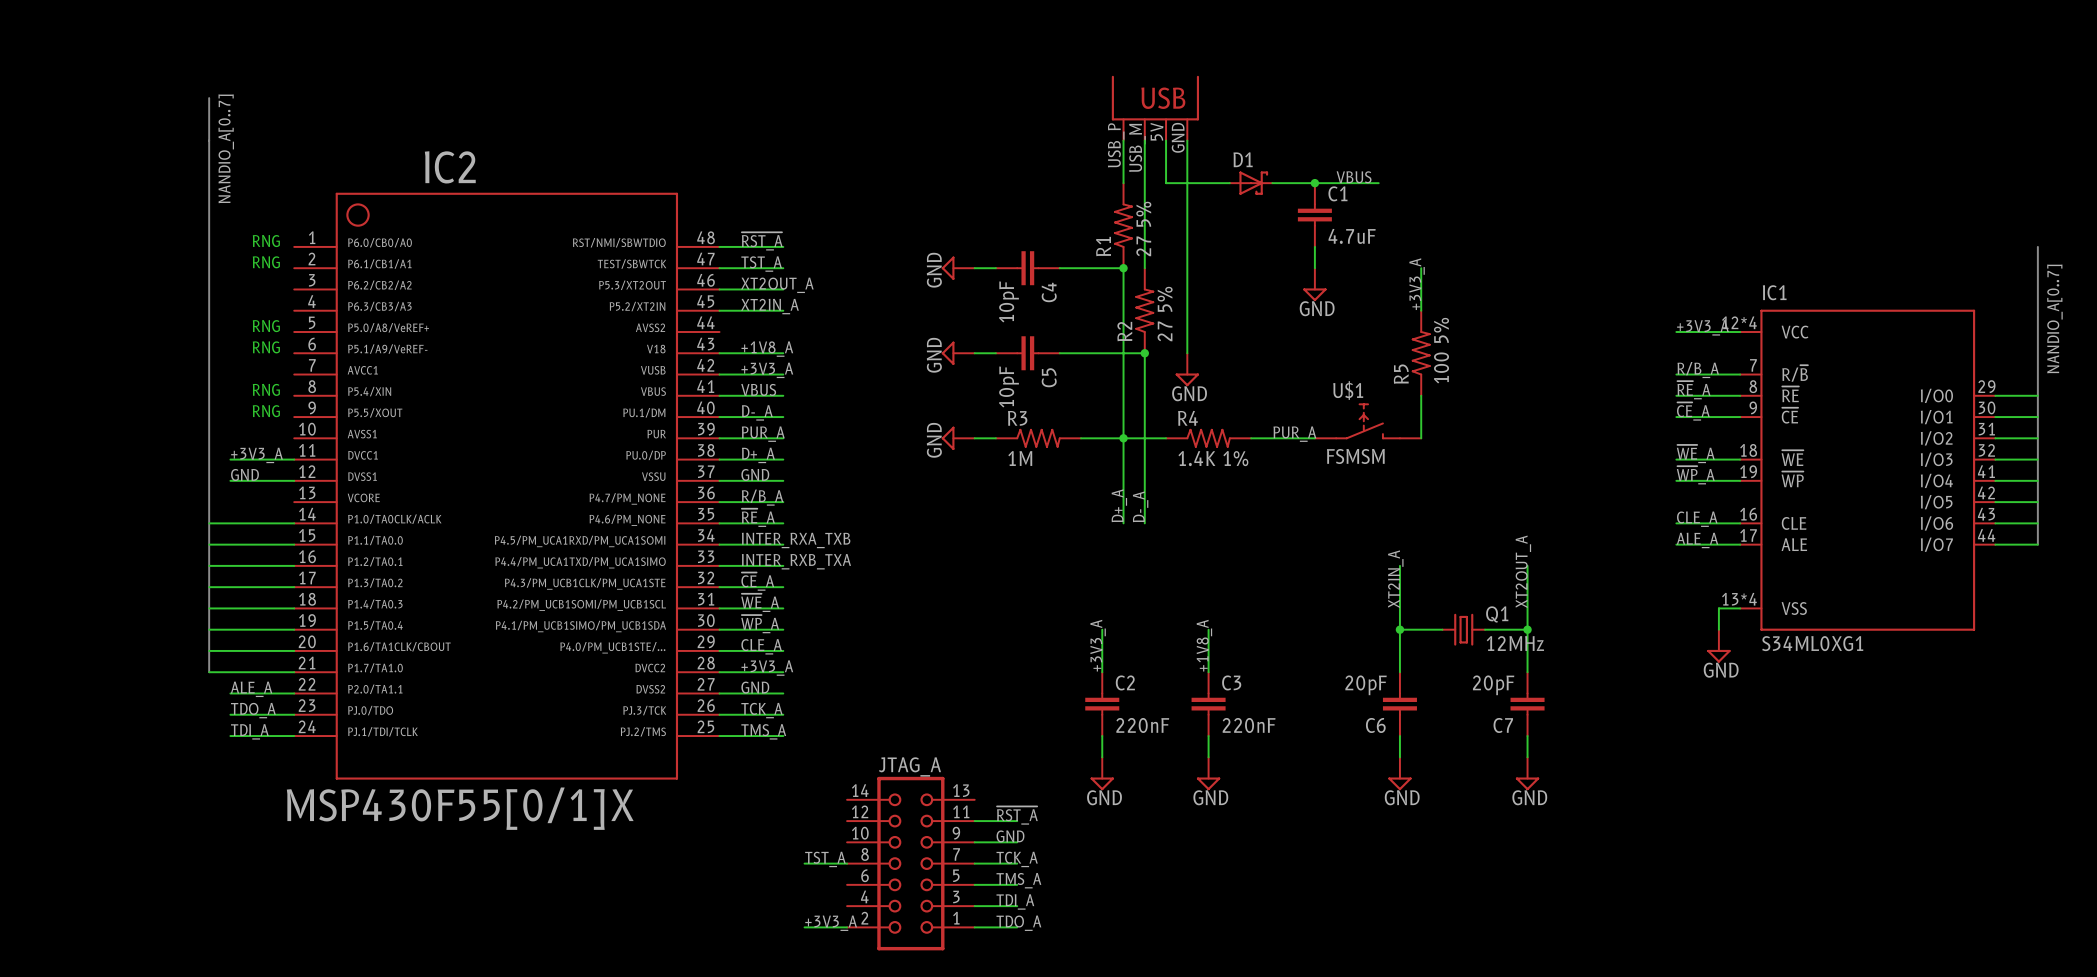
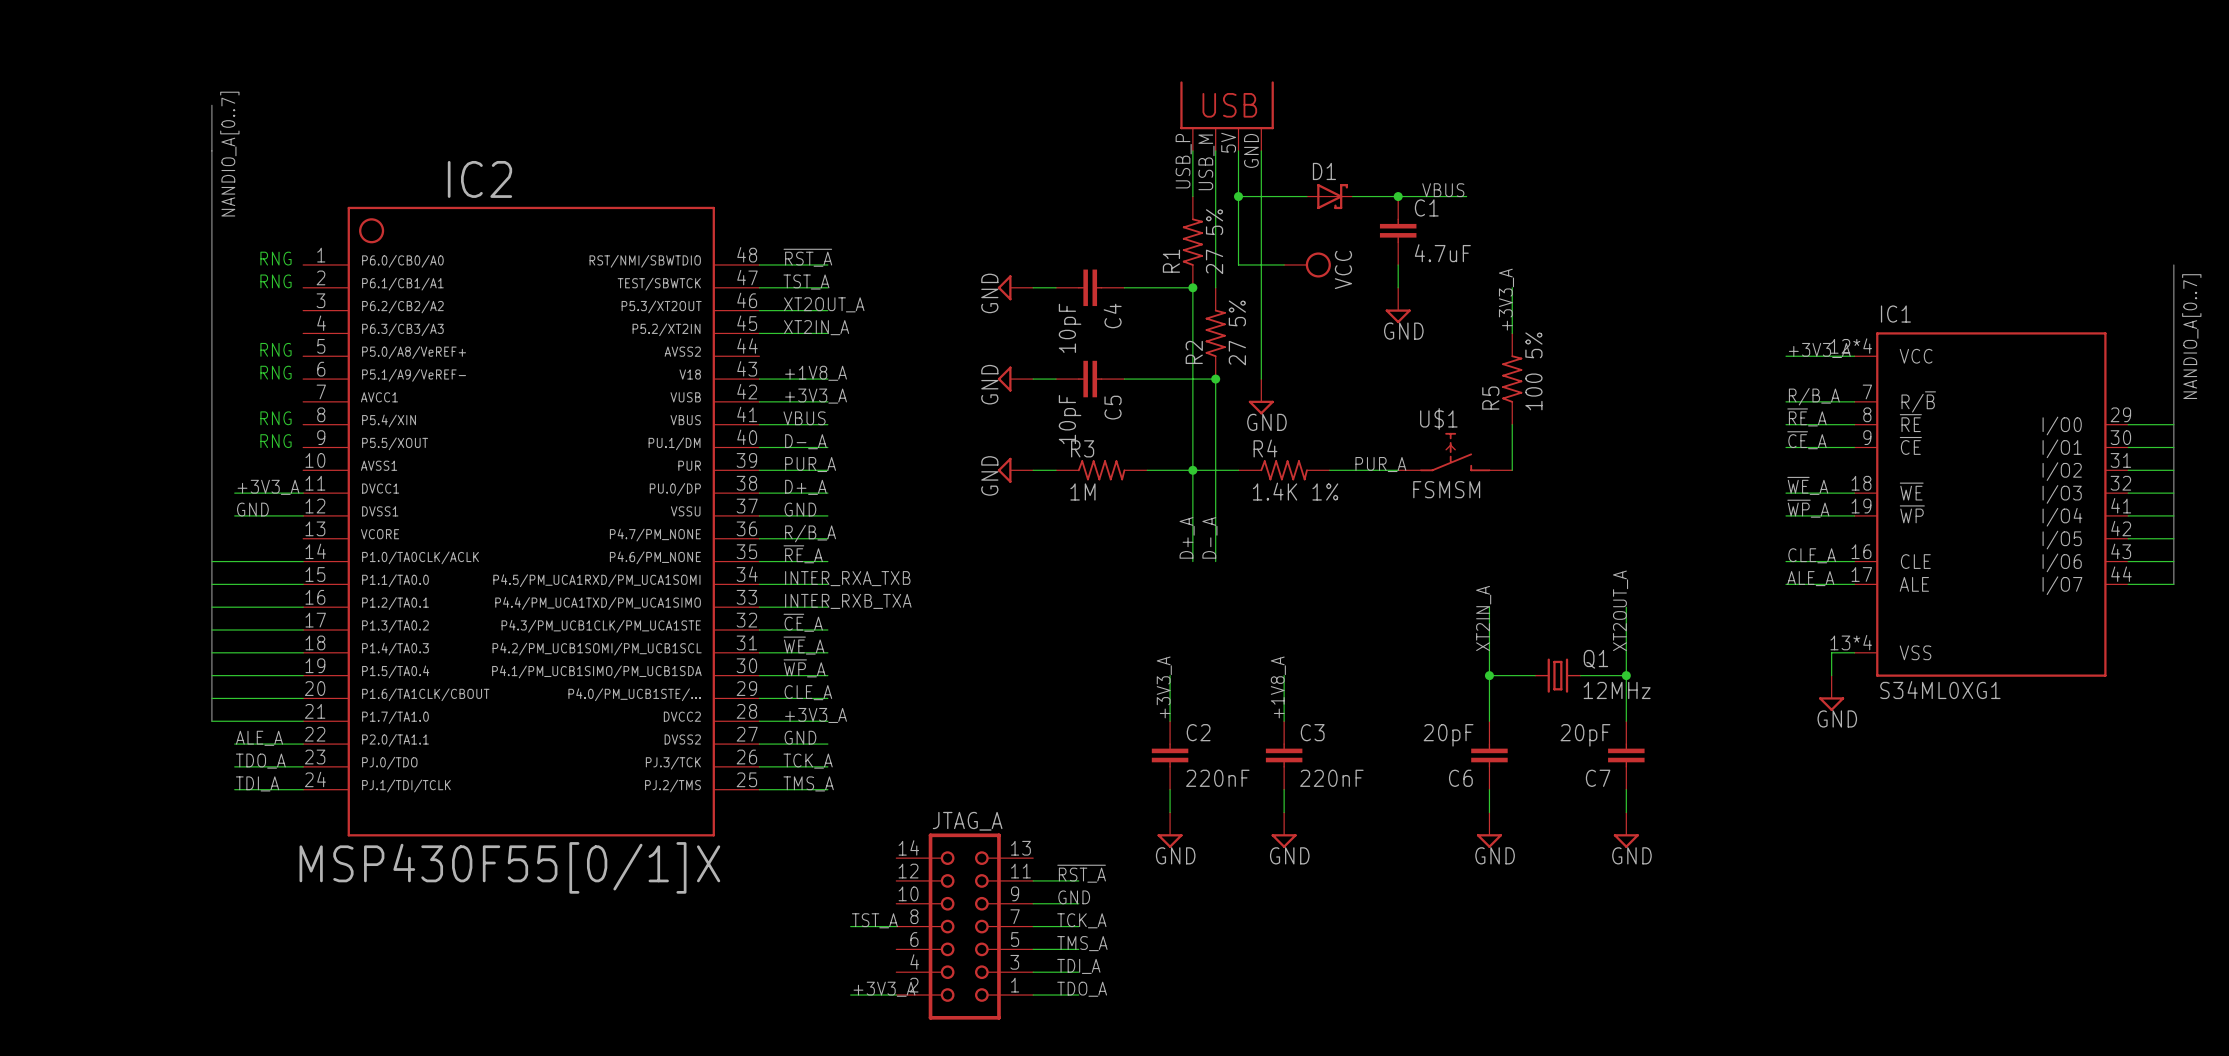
wire: none -> (1238, 196) (1238, 264) (1284, 264)
junction: none -> (1238, 196)
power symbol: none -> VCC (1307, 264)

